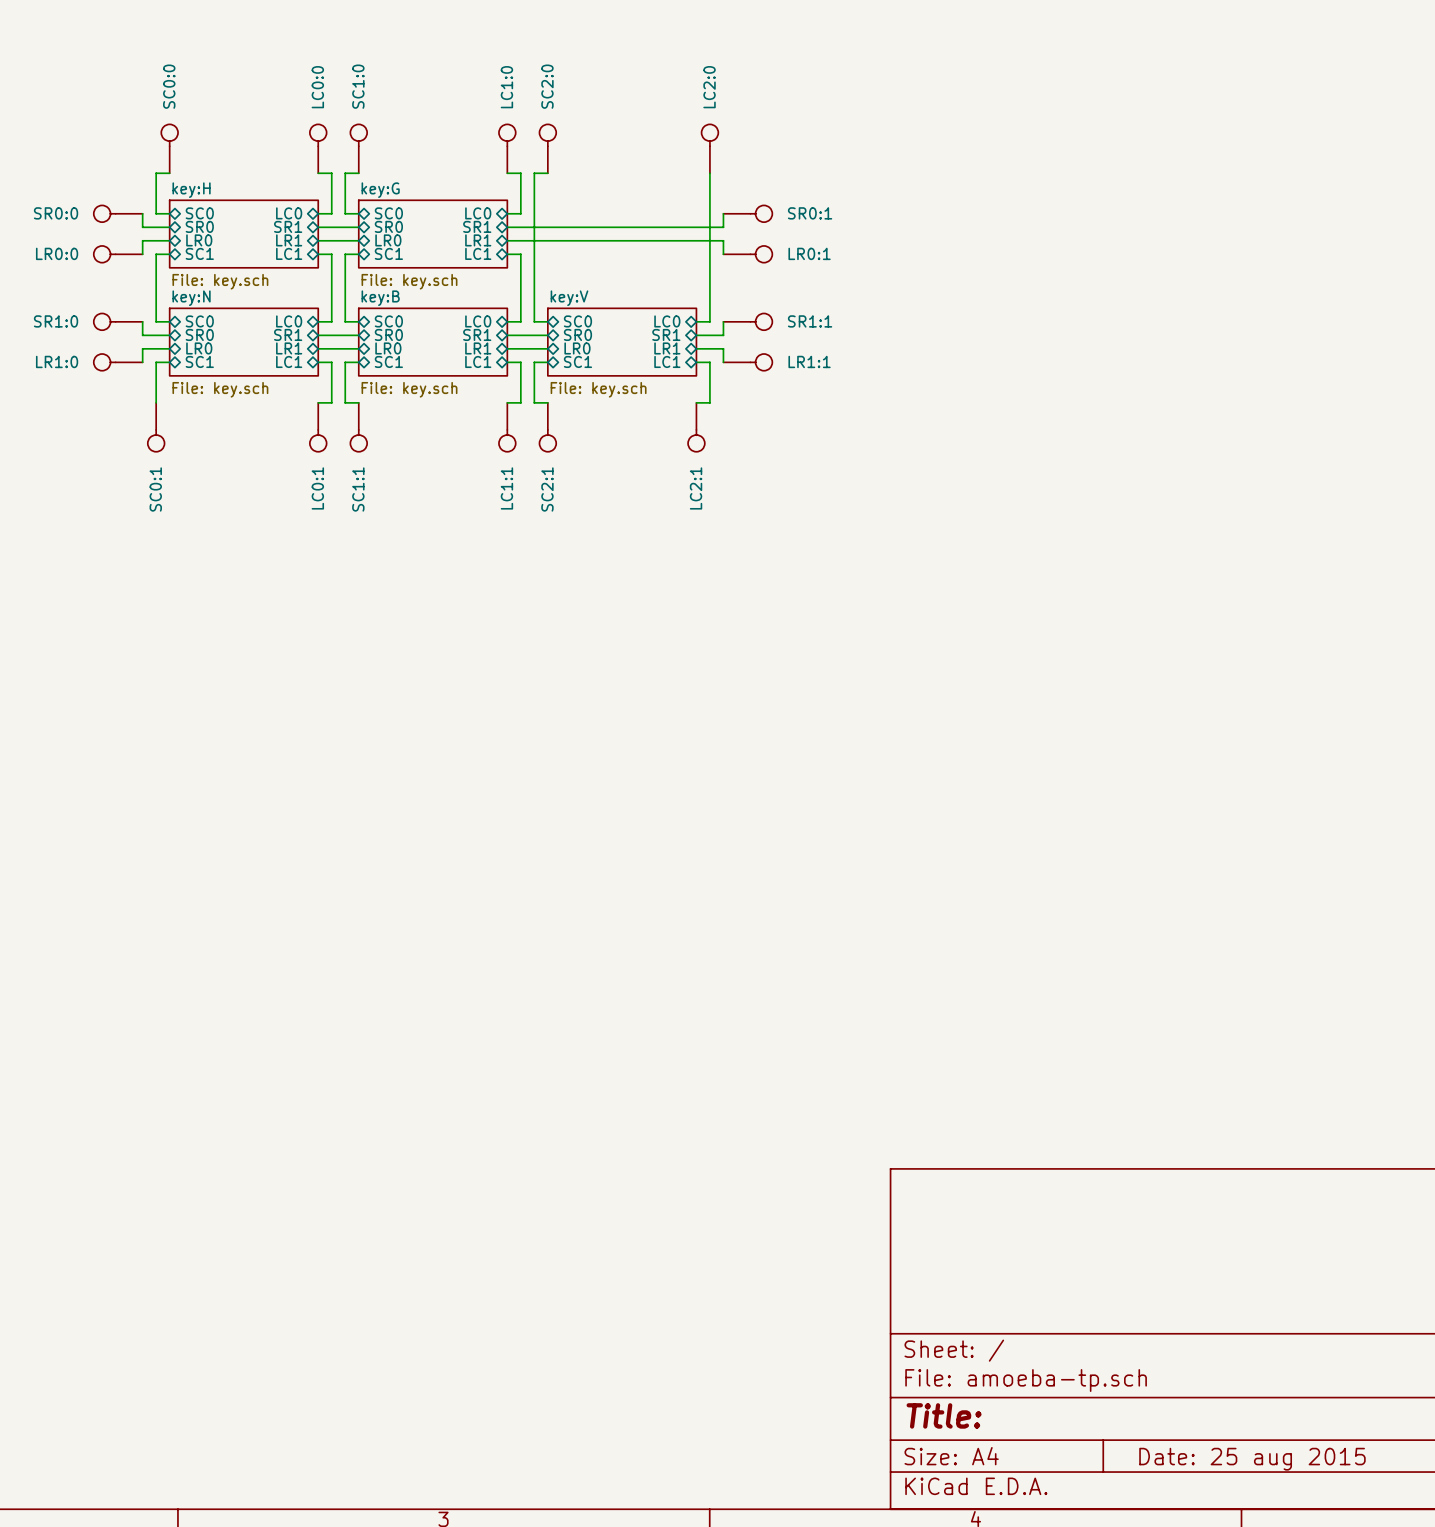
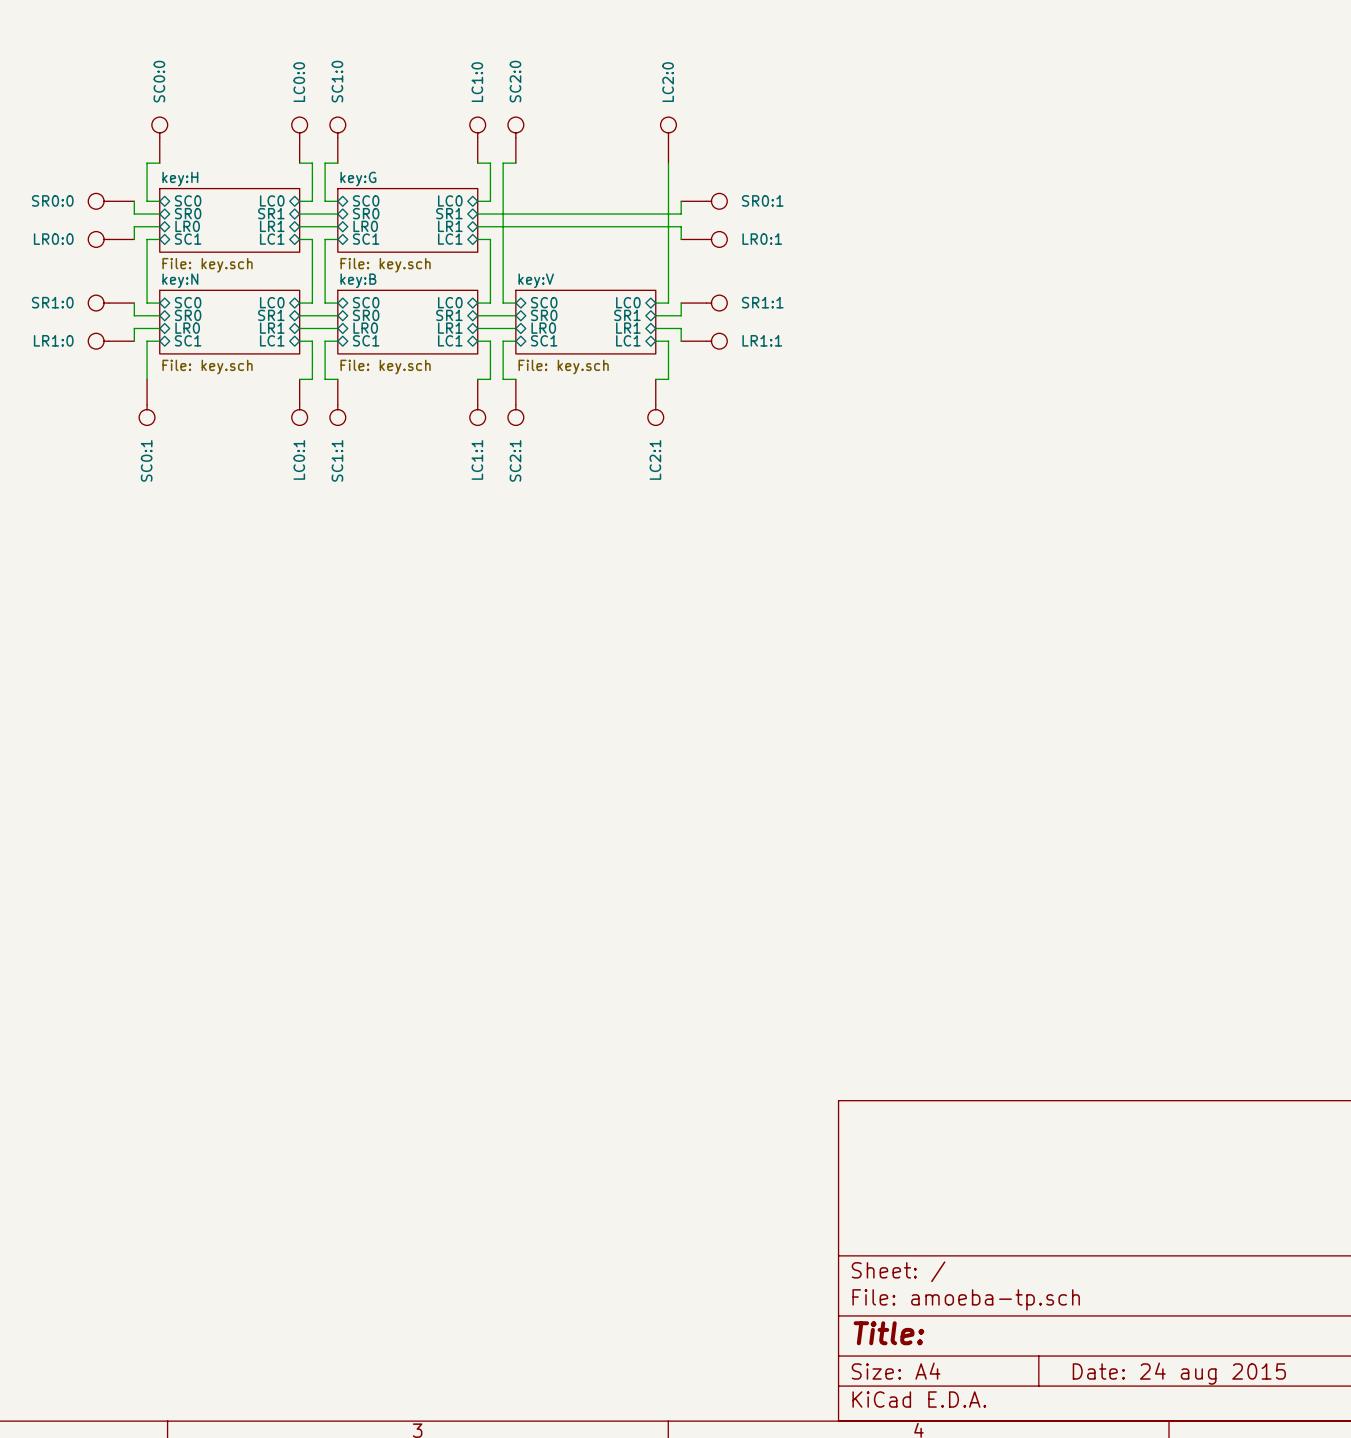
title block: Date: 25 aug 2015 (1252, 1459) -> Date: 24 aug 2015 (1179, 1373)

